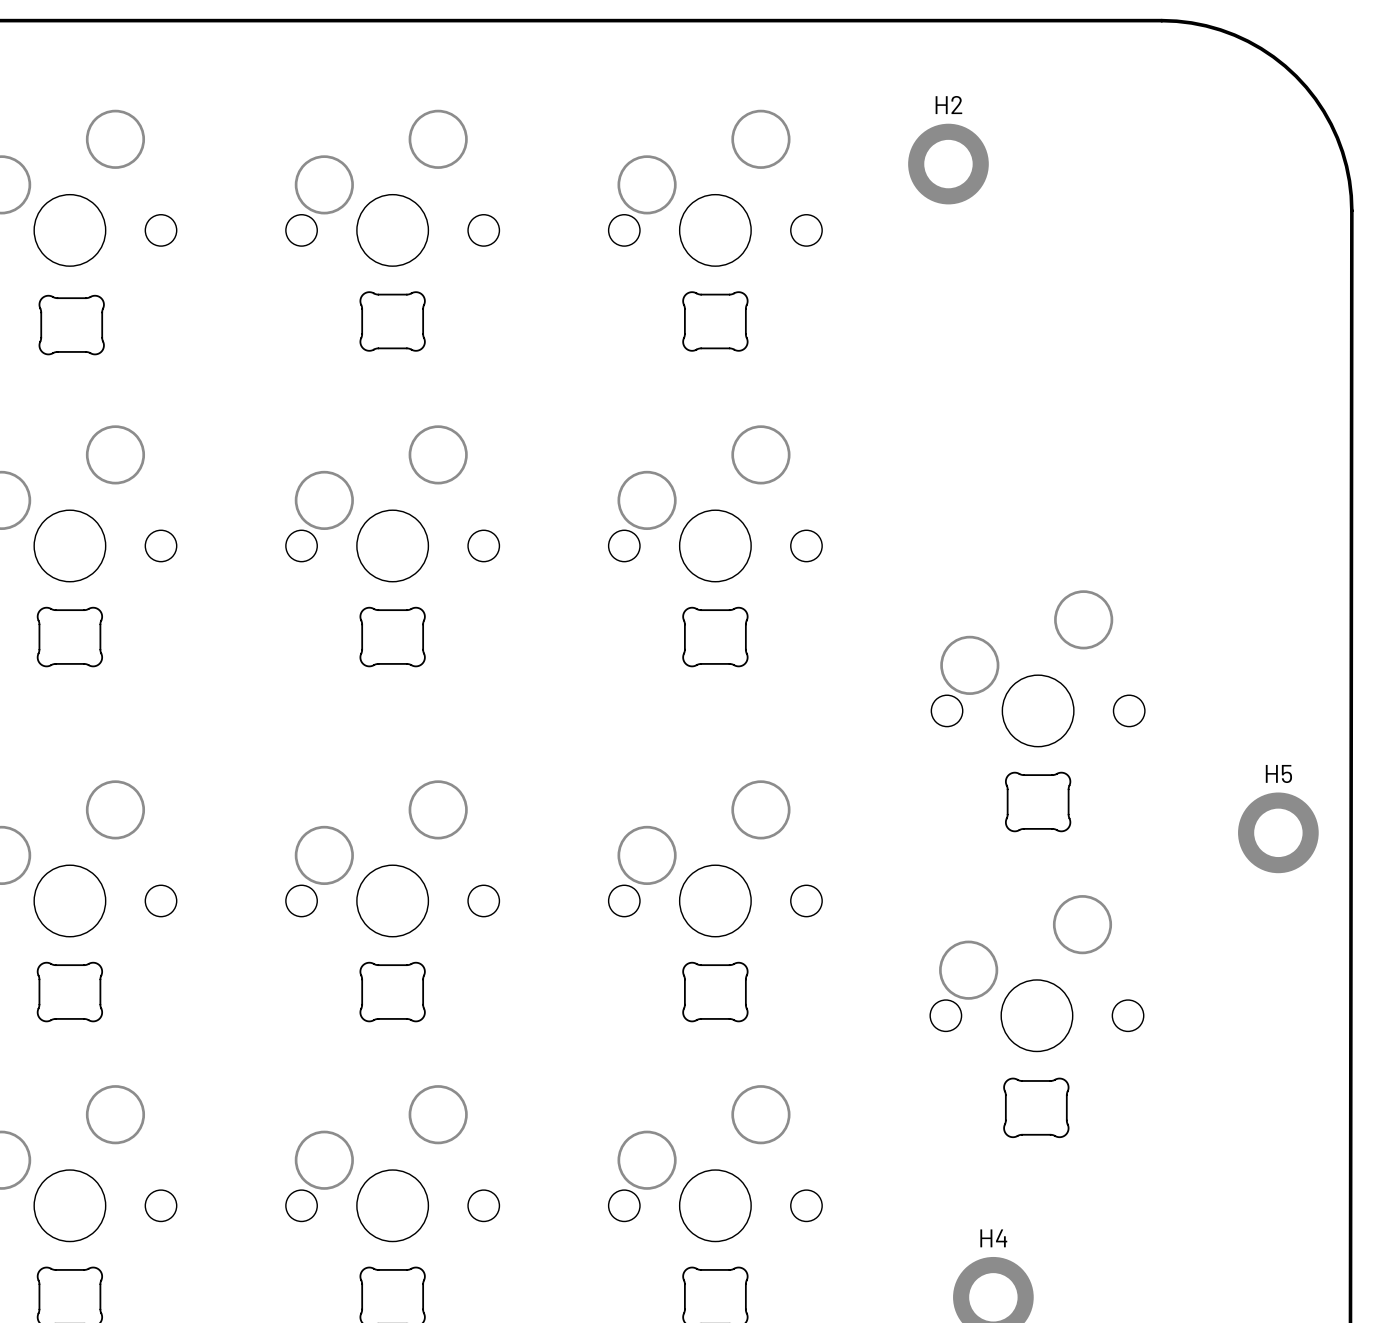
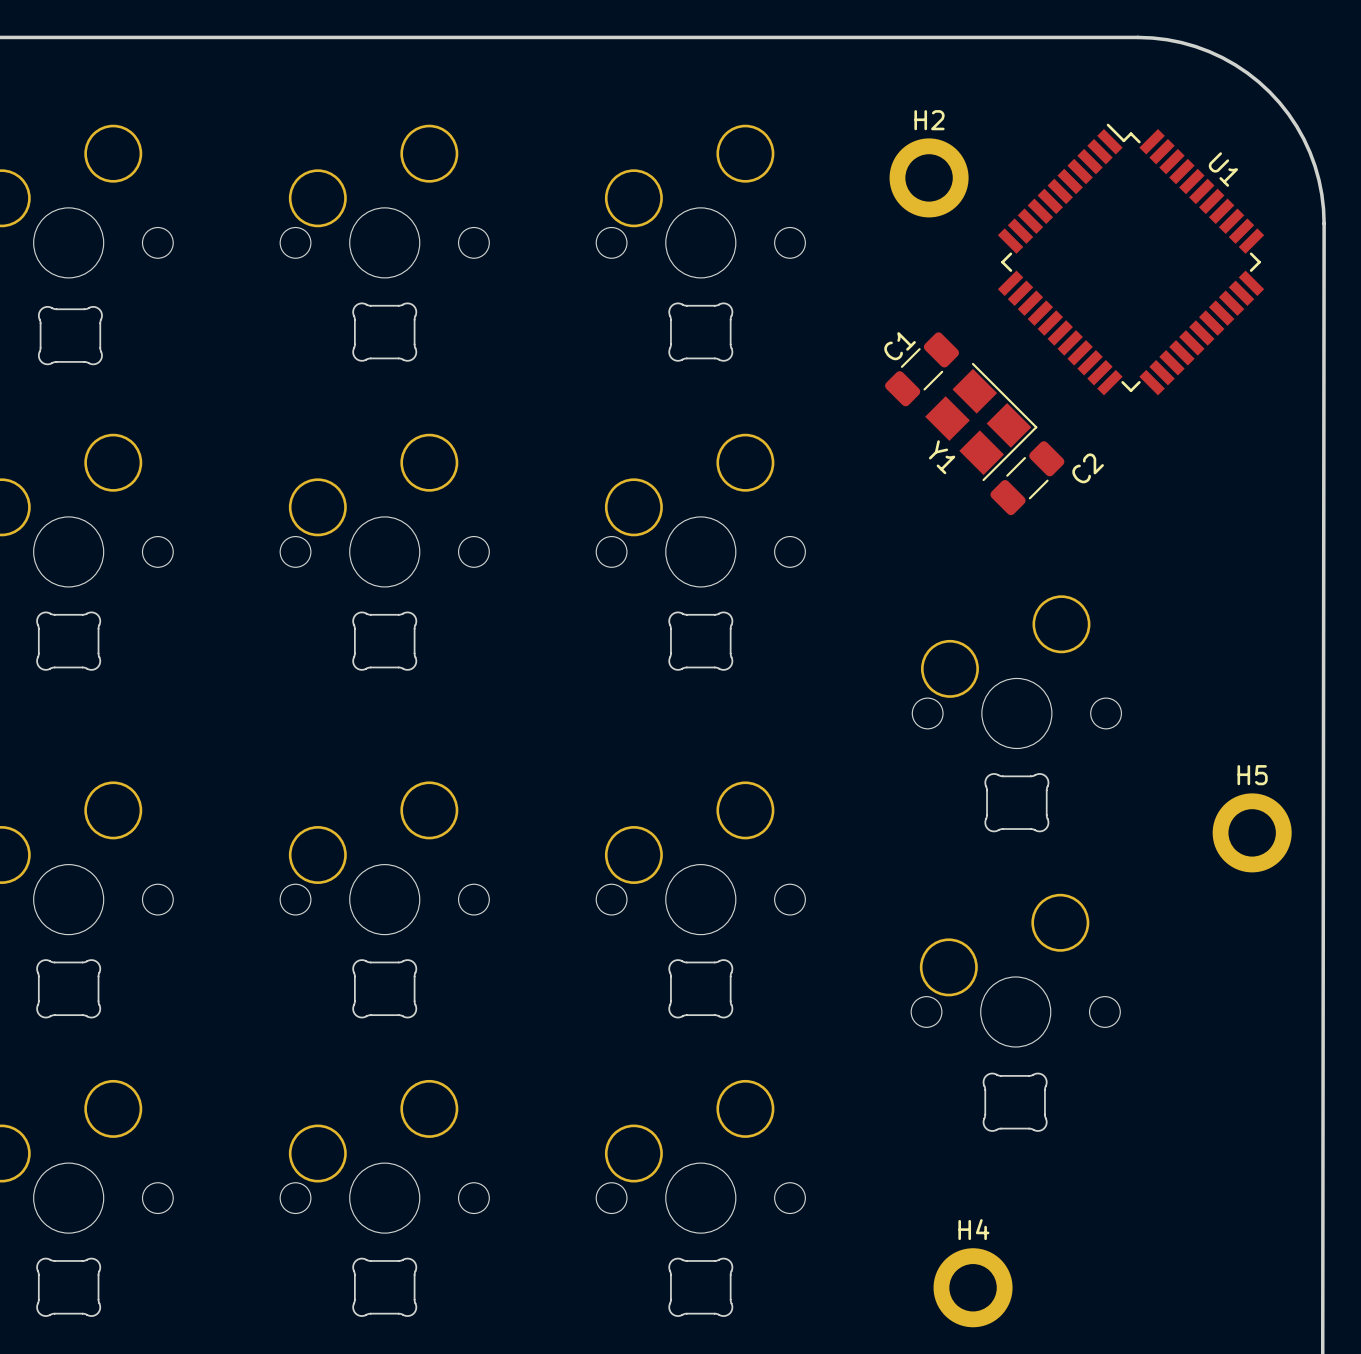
U1: none -> (1131, 259)
C1: none -> (922, 369)
Y1: none -> (981, 421)
C2: none -> (1027, 478)

